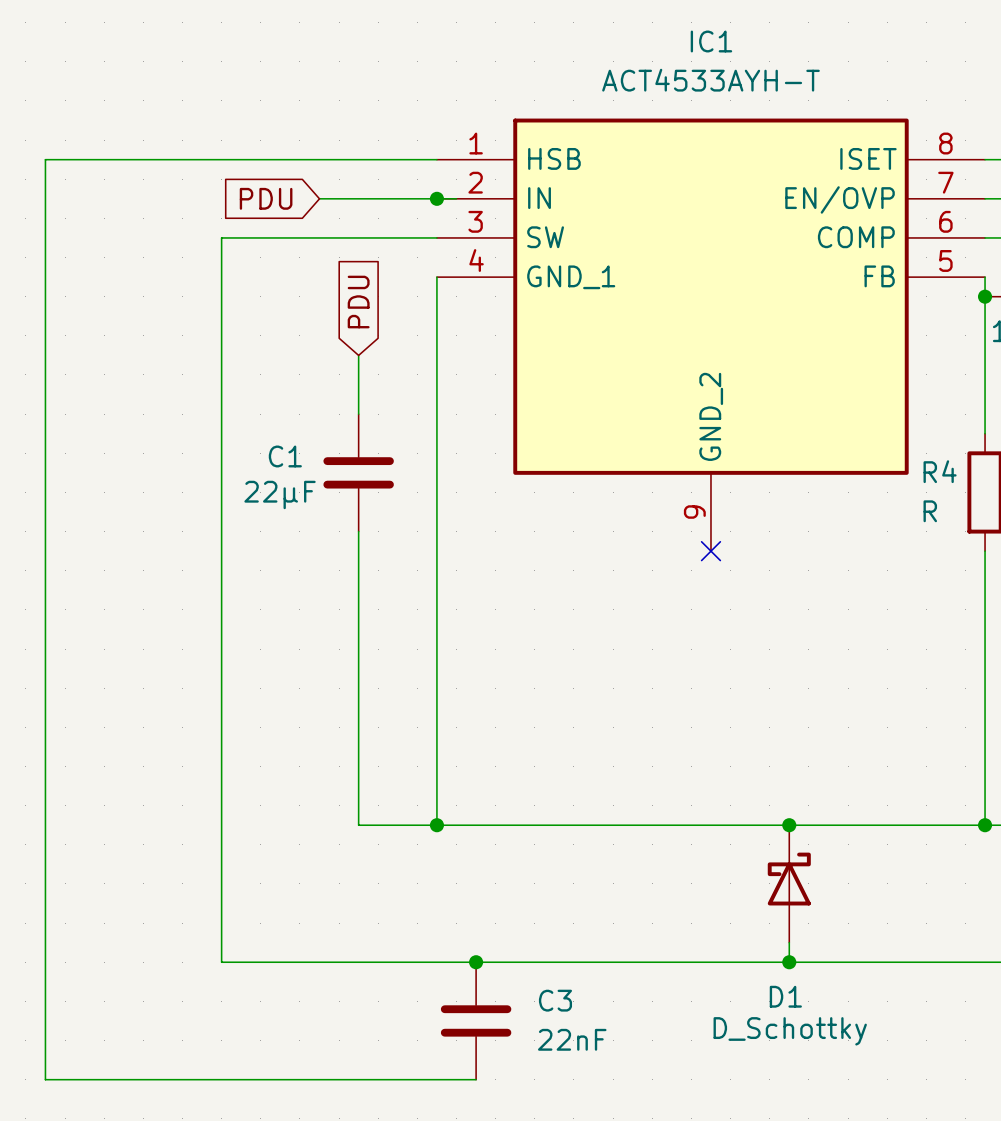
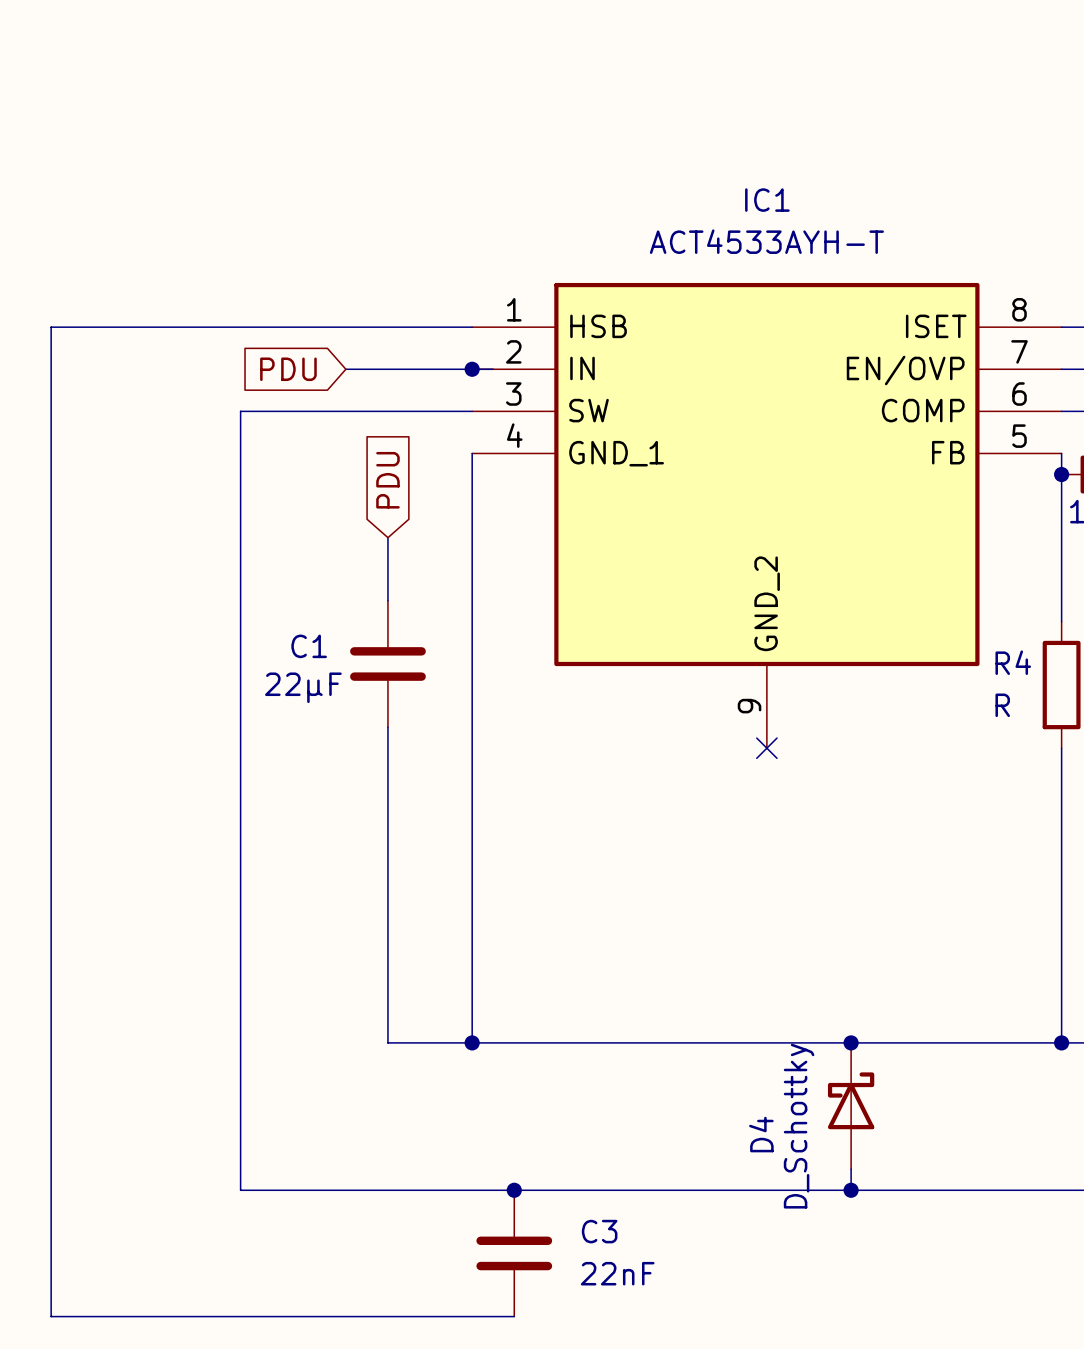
D1 name: D1 (785, 996) -> D4 (761, 1134)
D1 value rotation: 0° (790, 1031) -> 90° counterclockwise (799, 1126)

